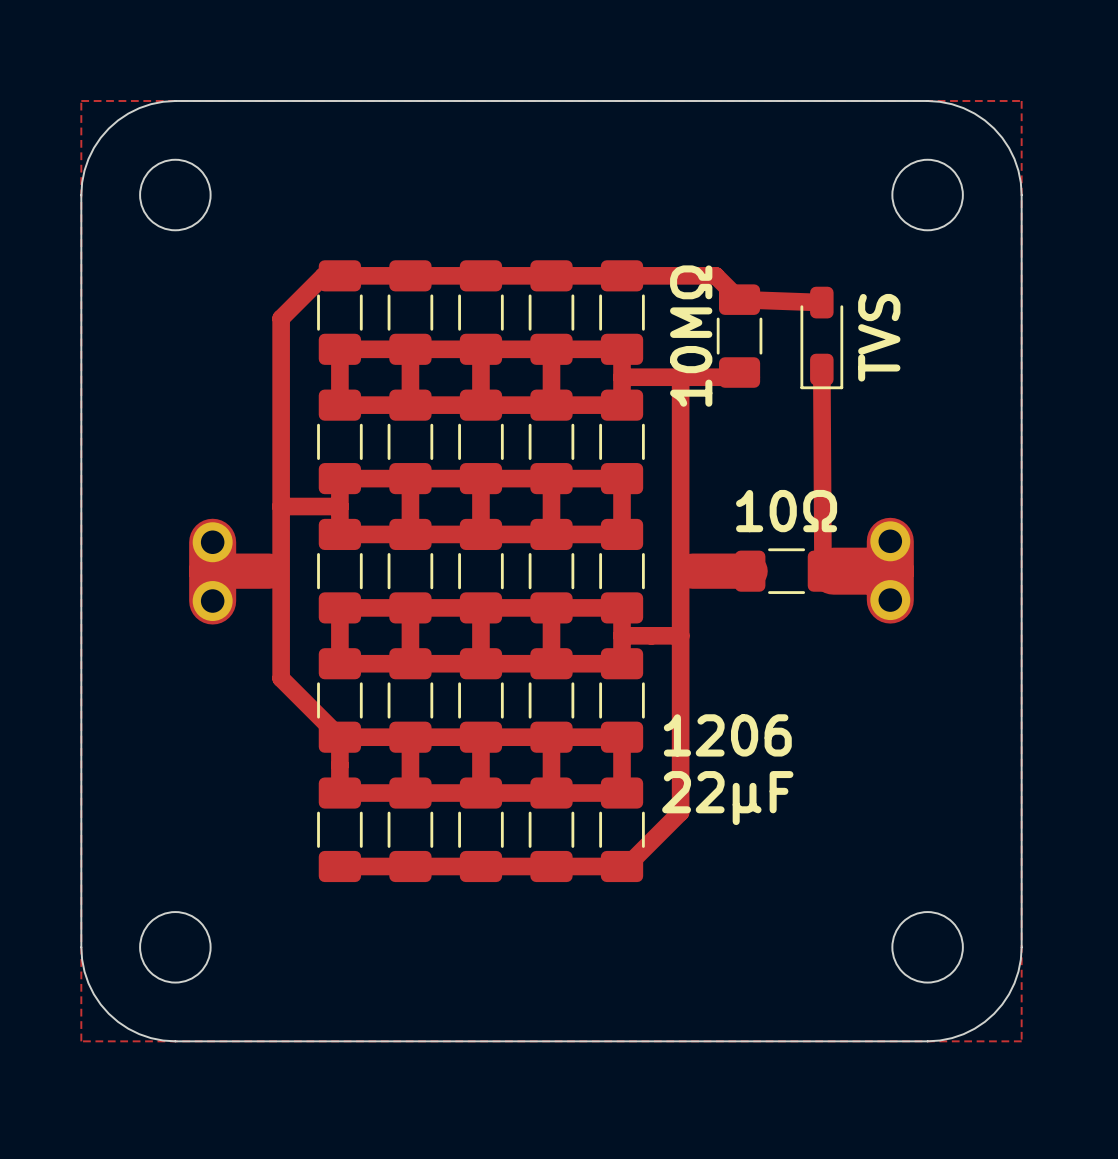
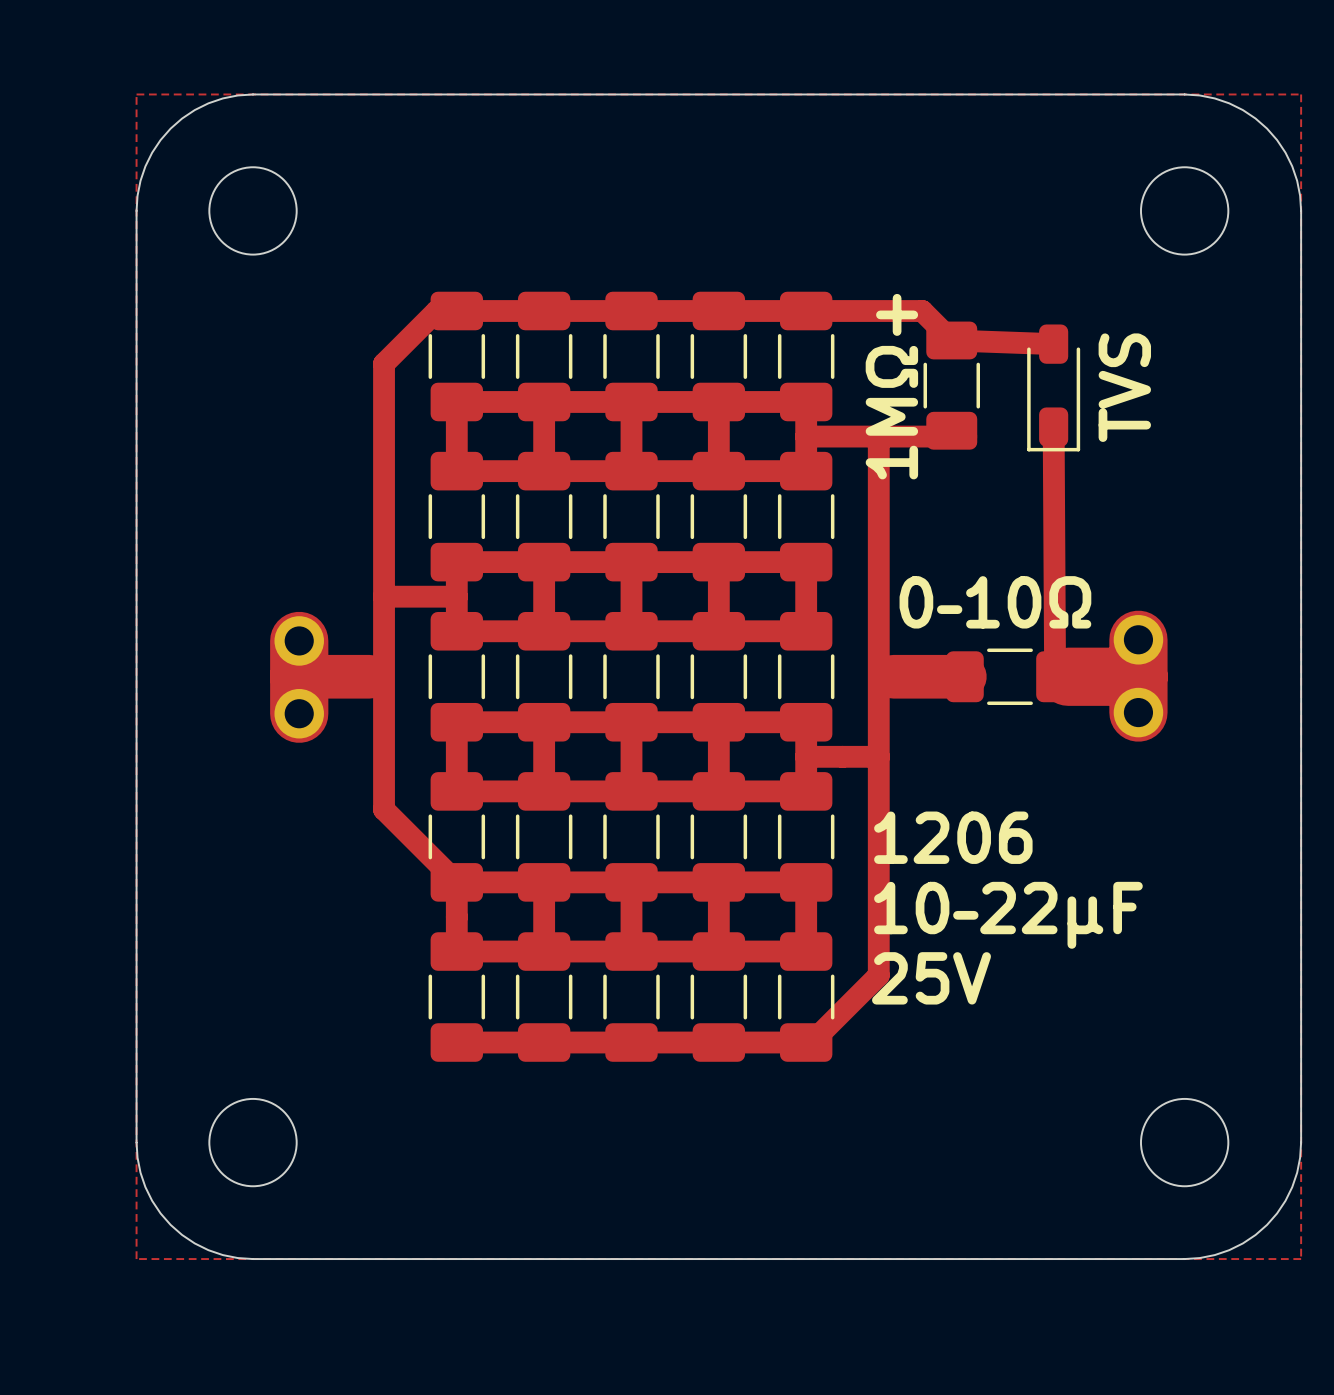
part value: 10MΩ (691, 336) -> 1MΩ+ (891, 386)
part value: 10Ω (786, 511) -> 0–10Ω (995, 602)
text position: 1206 (727, 735) -> 1206 (953, 837)
text: 22µF (727, 798) -> 10–22µF (1008, 915)
text: none -> 25V (931, 978)

